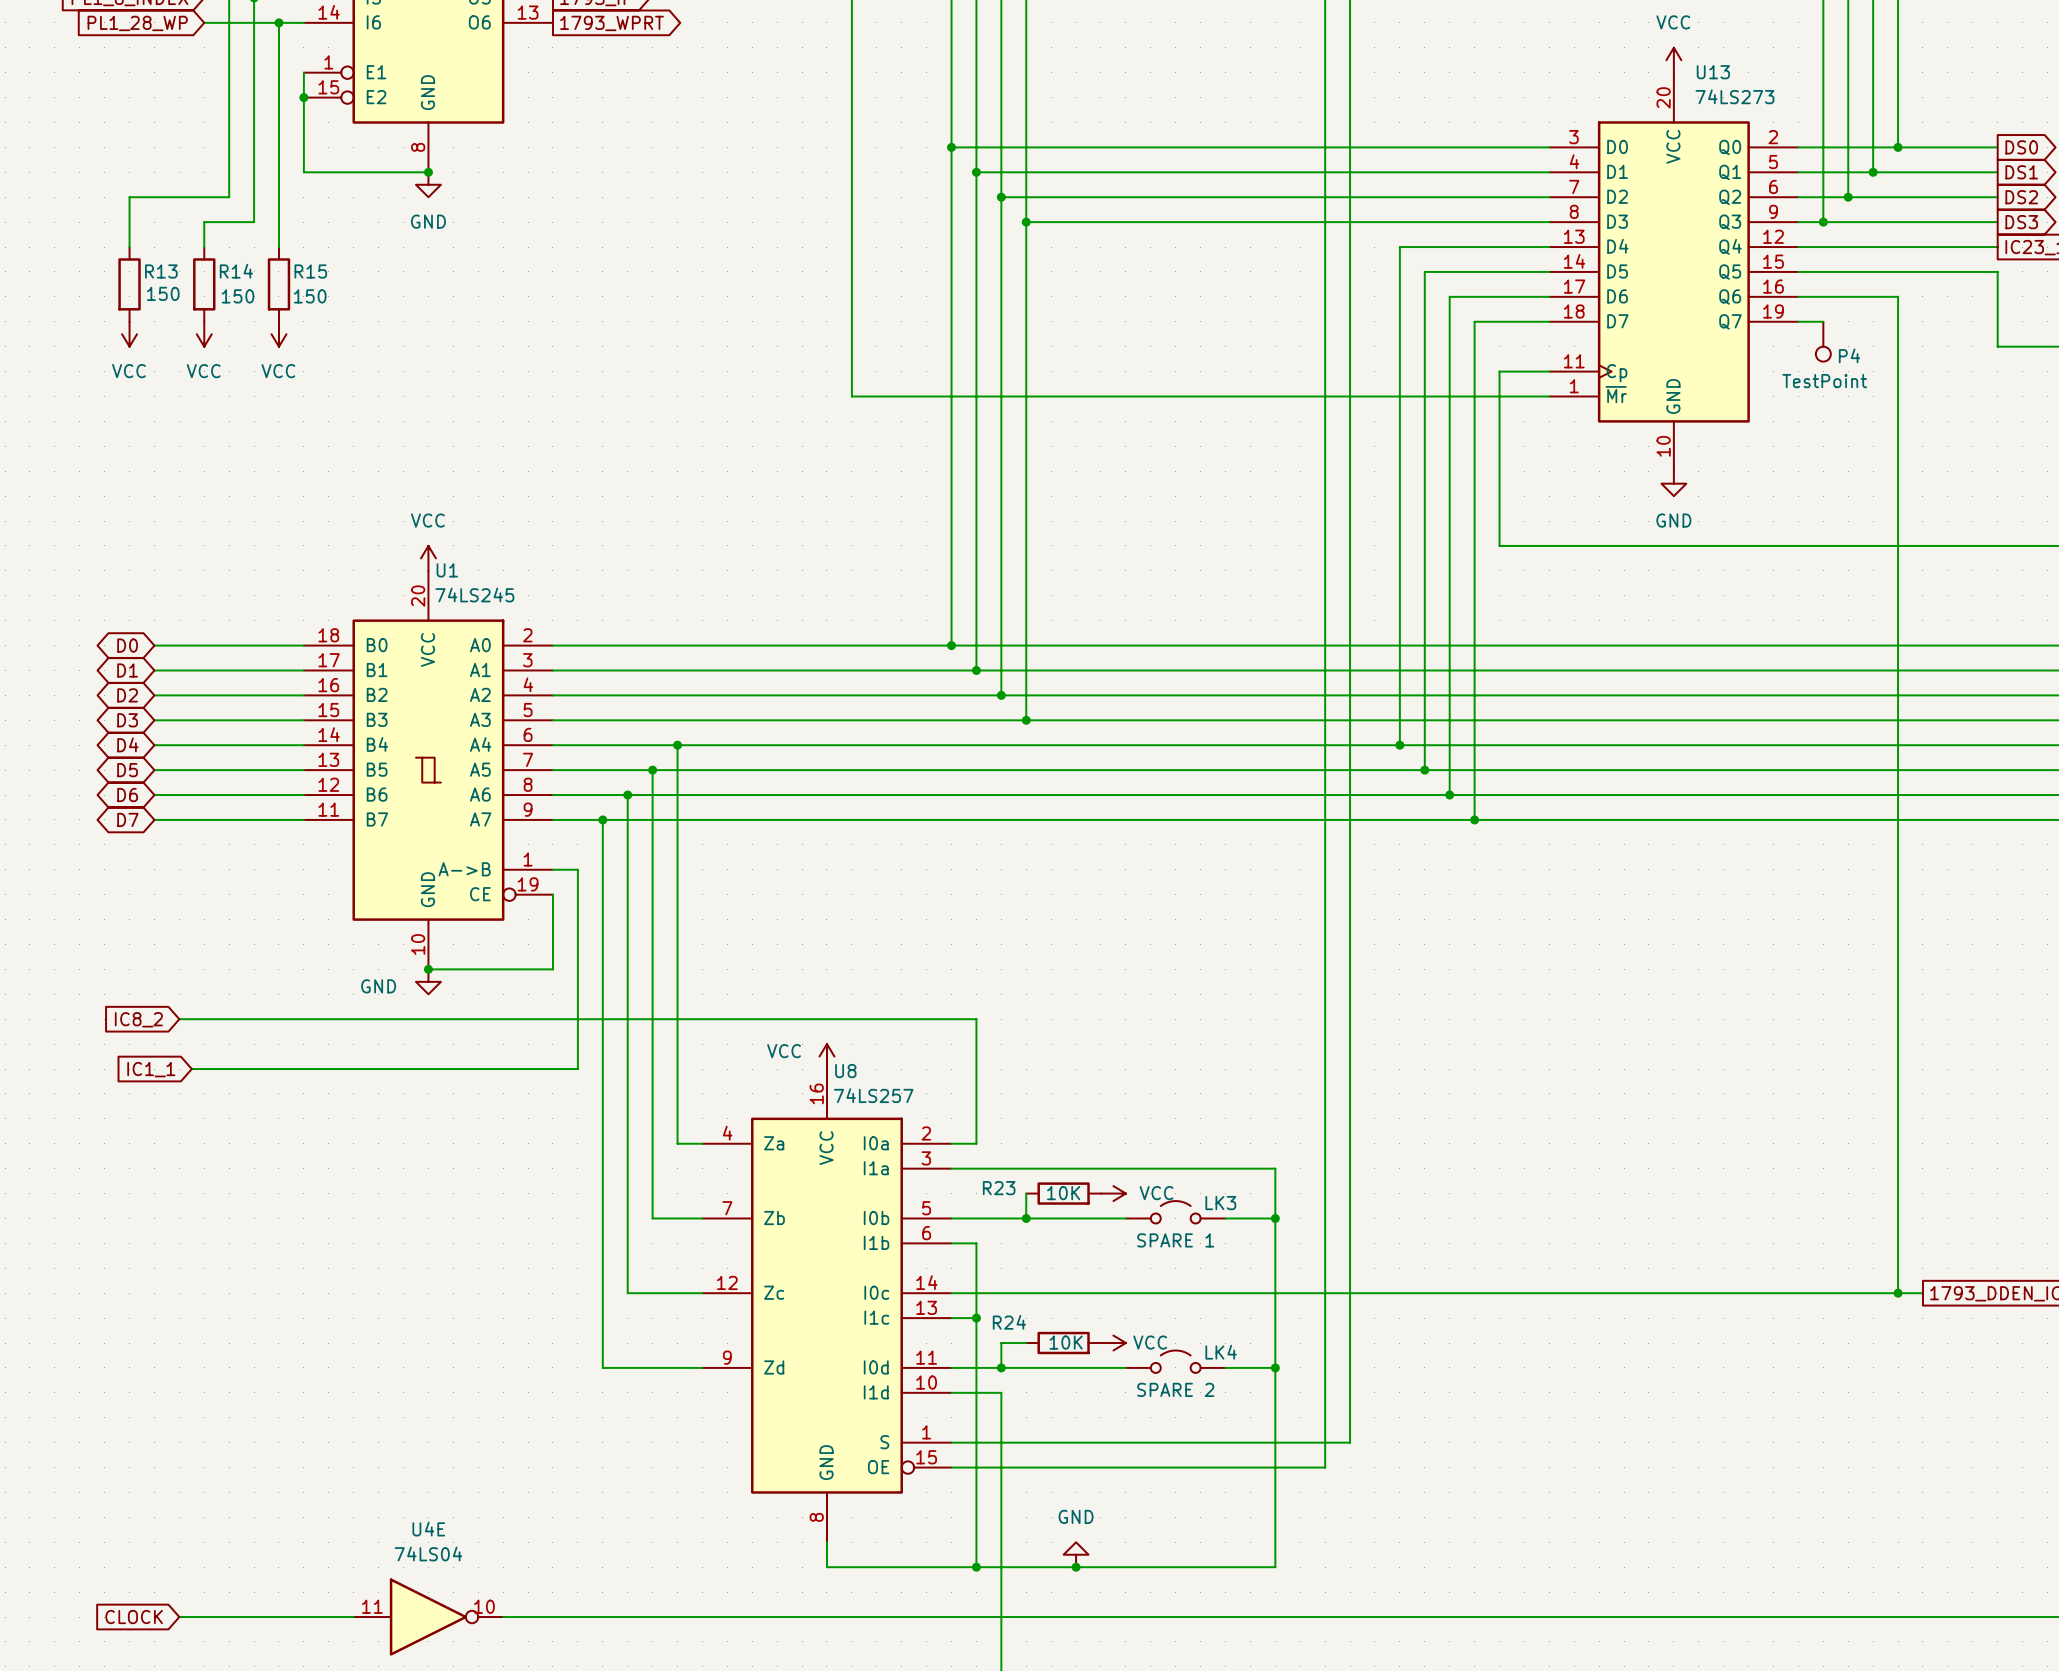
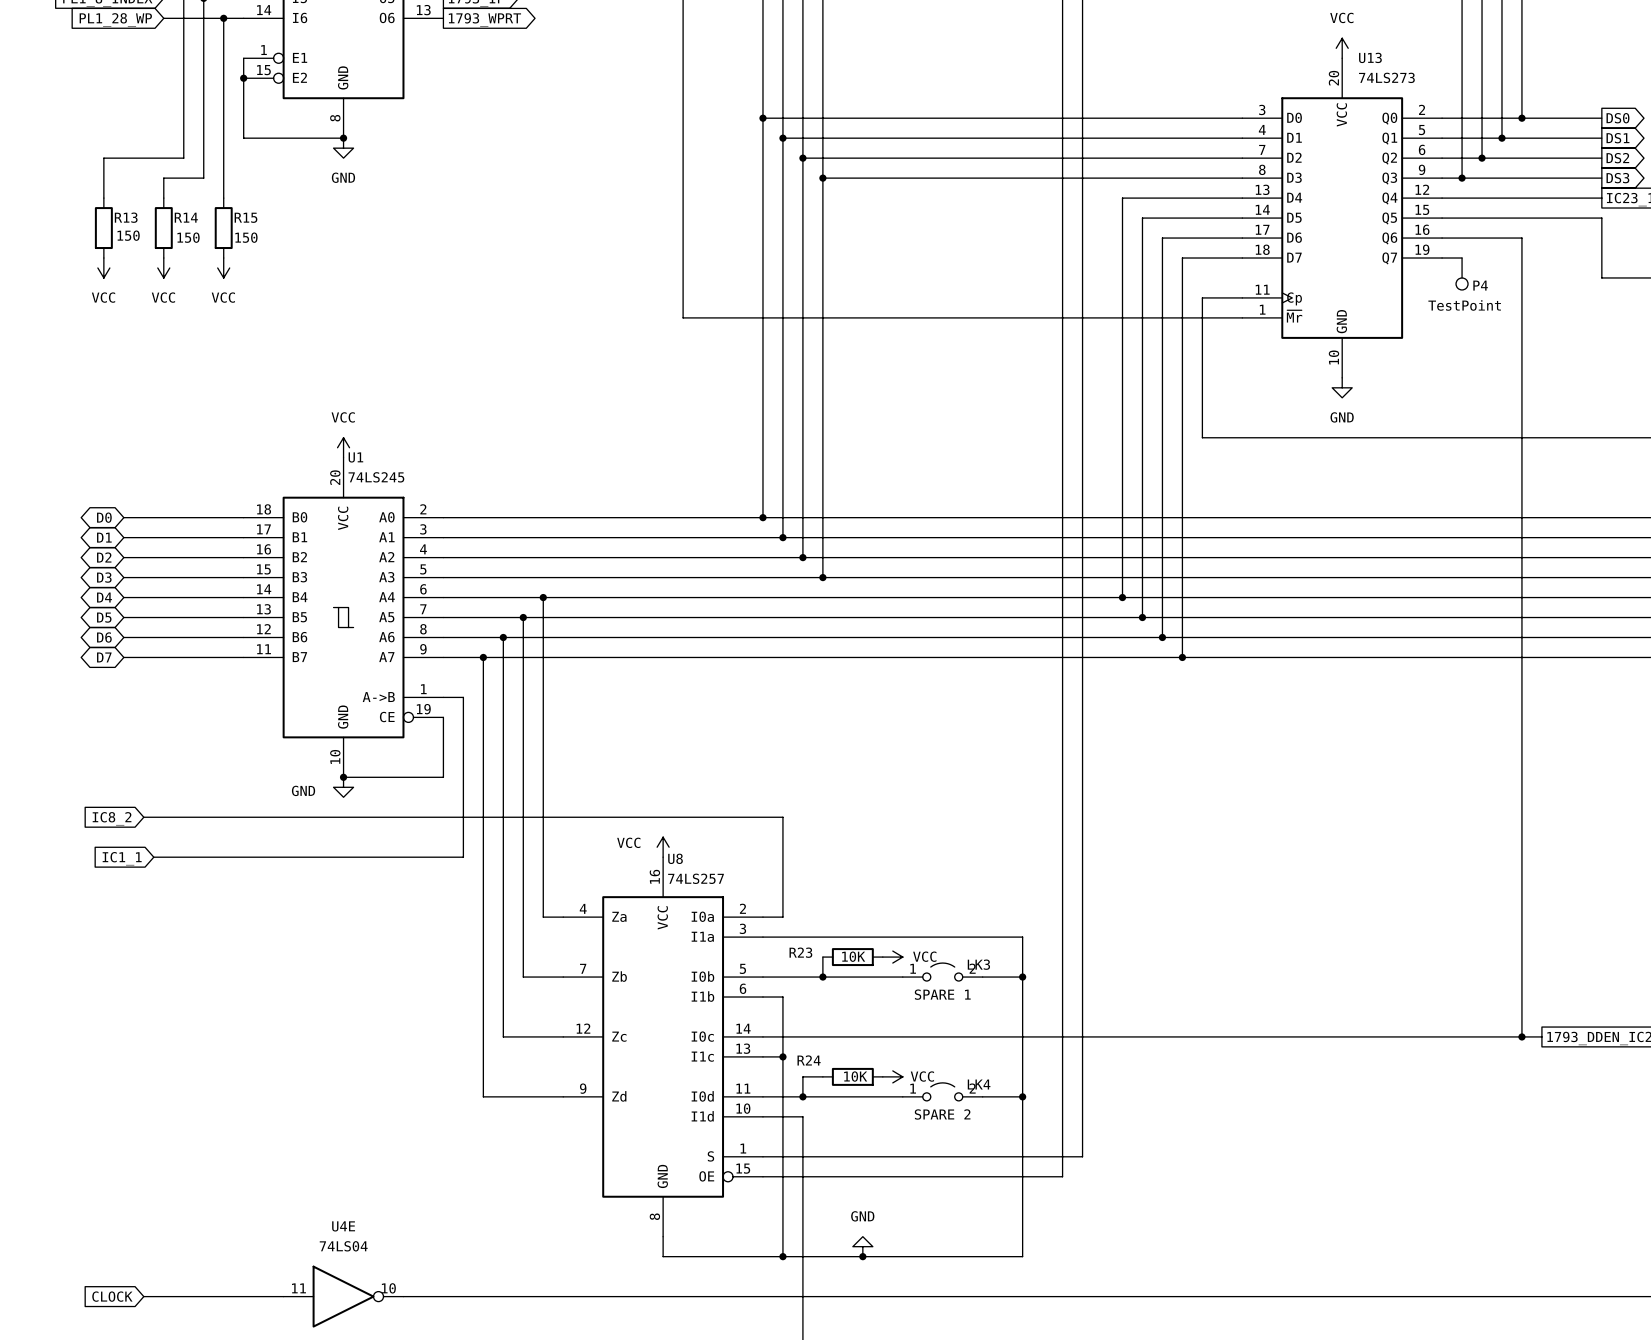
LK3 pin number: none -> 1 (913, 968)
LK3 pin number: none -> 2 (972, 968)
LK4 pin number: none -> 1 (913, 1088)
LK4 pin number: none -> 2 (972, 1088)

